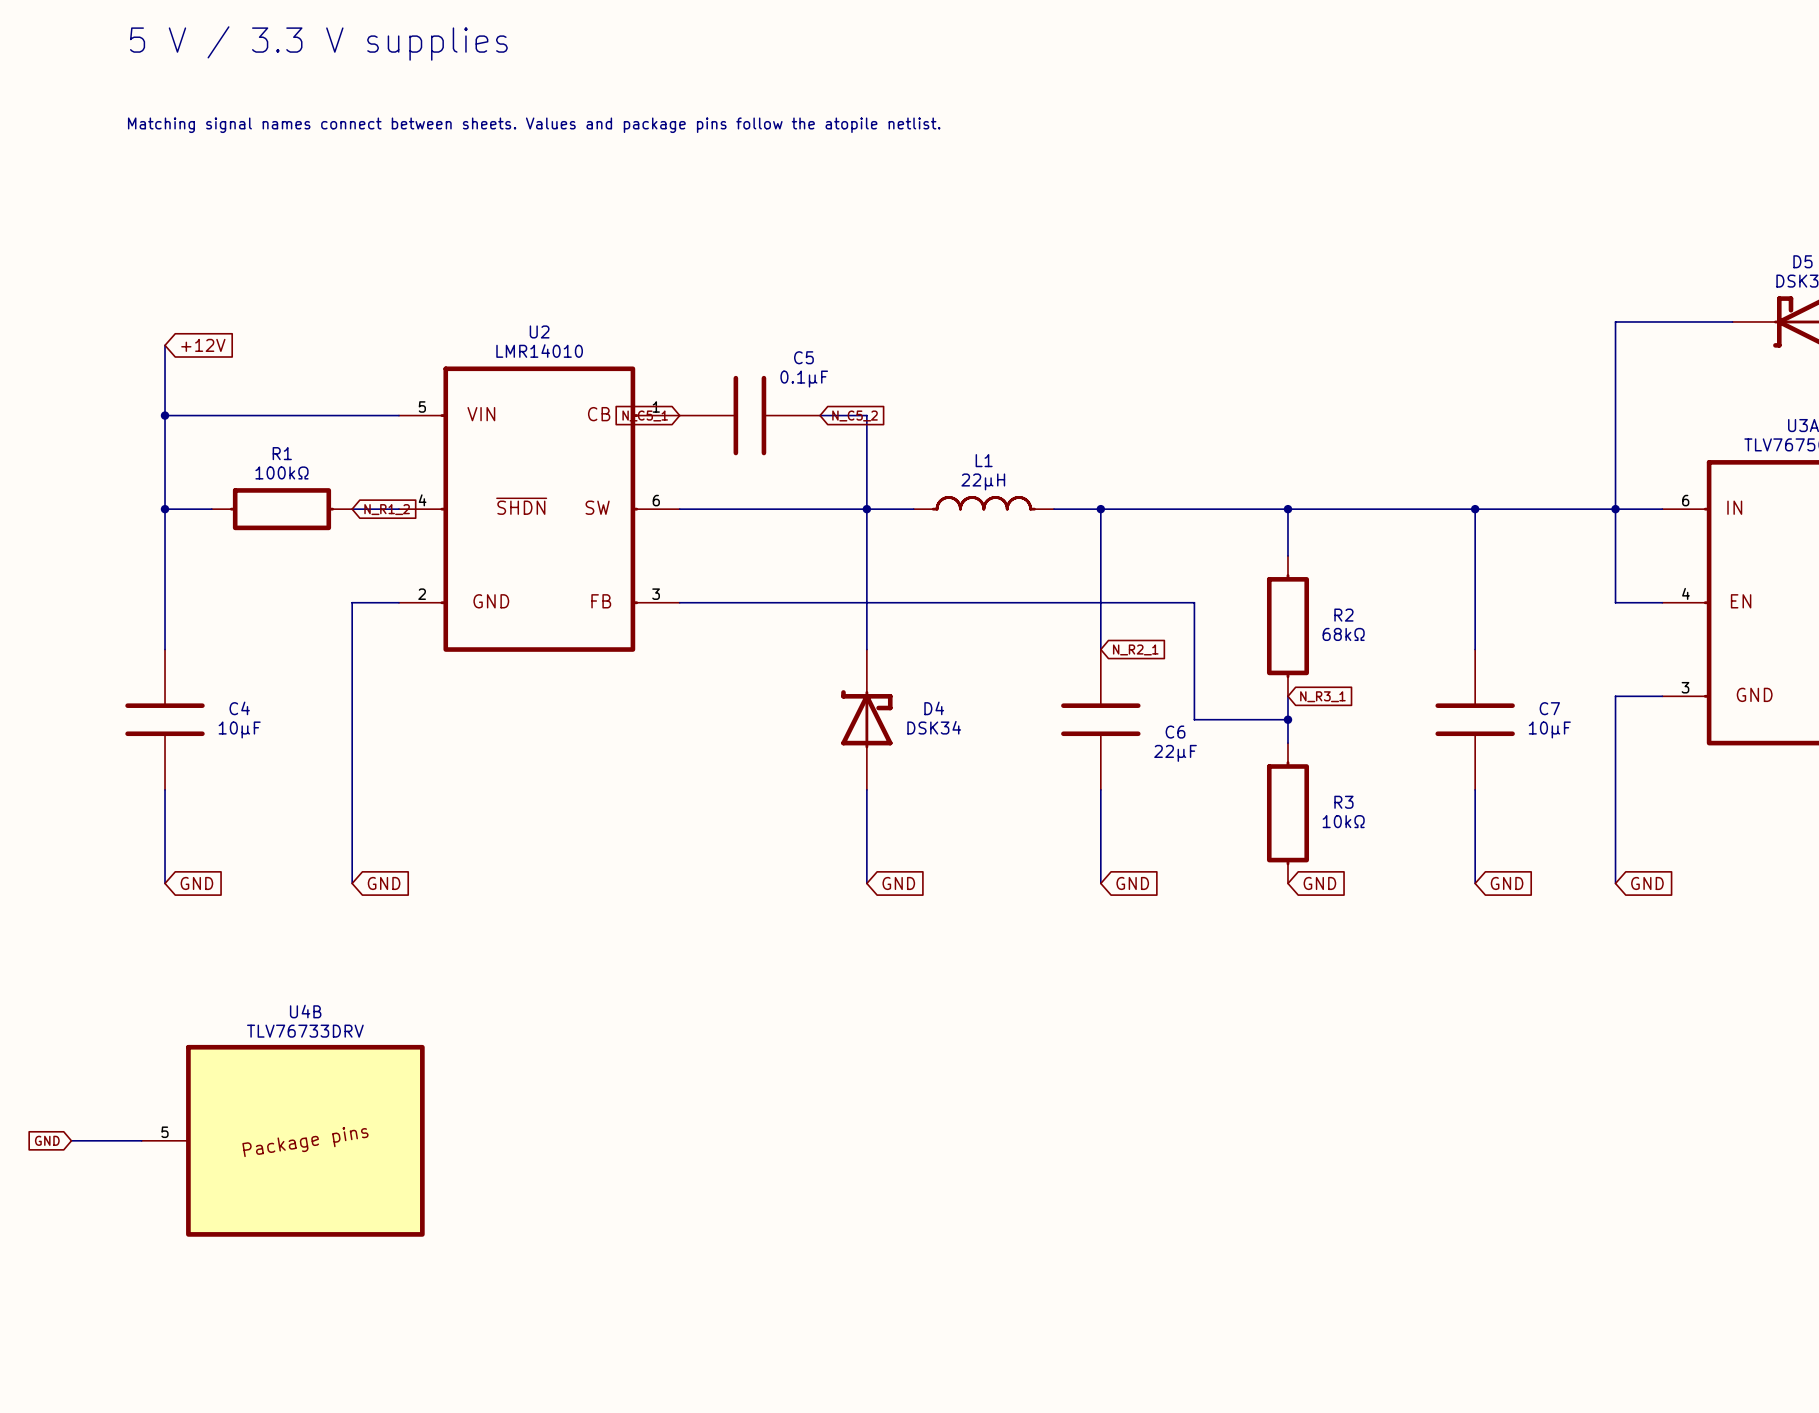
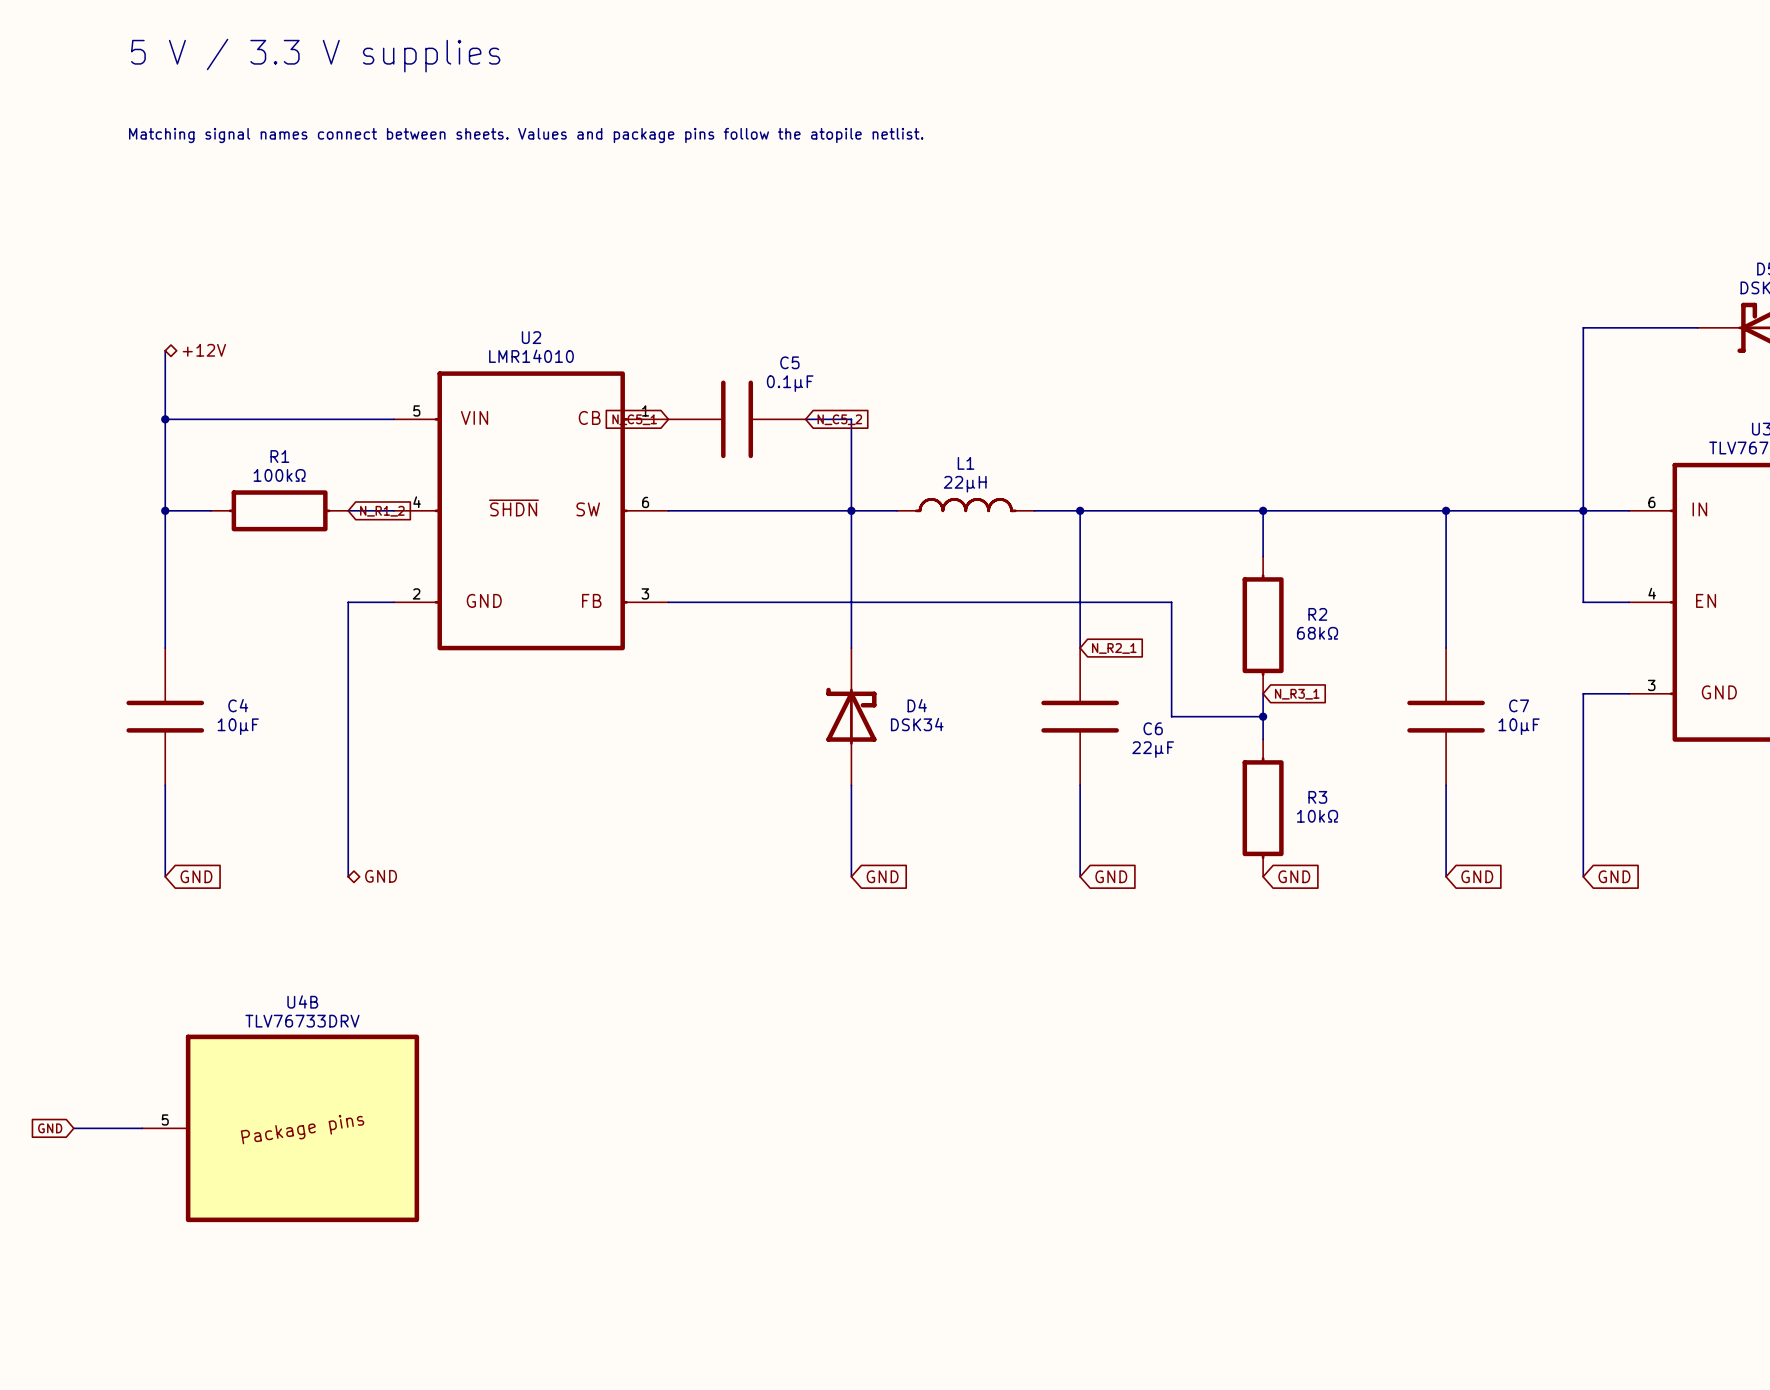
hierarchical label: none -> +12V (204, 350)
global label: +12V (203, 345) -> none
global label: GND (384, 883) -> none
hierarchical label: none -> GND (381, 876)

